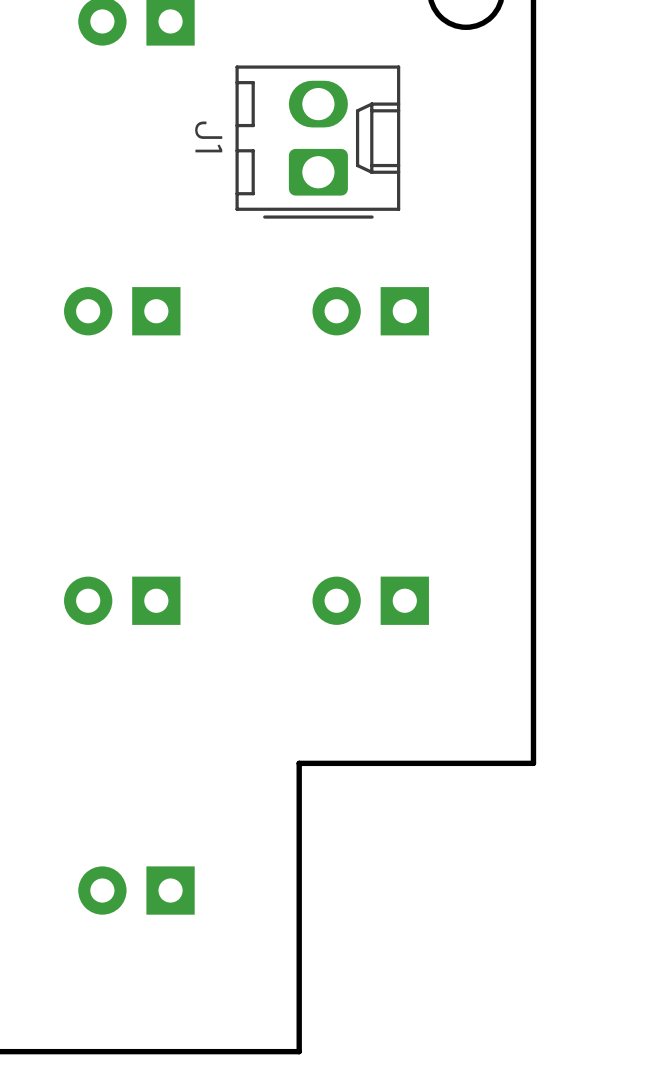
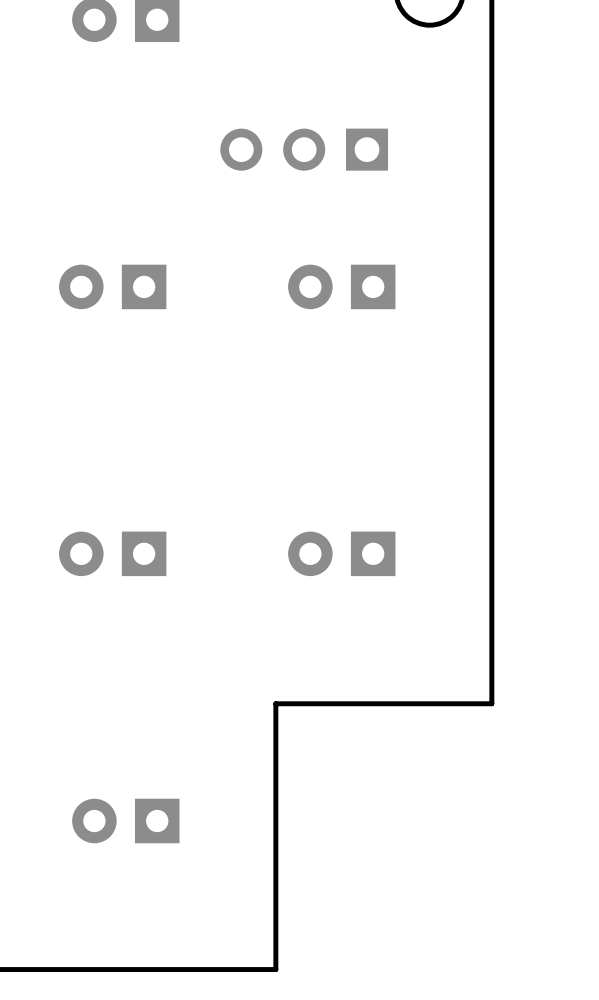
J1: (317, 142) -> none
part: none -> (304, 149)

